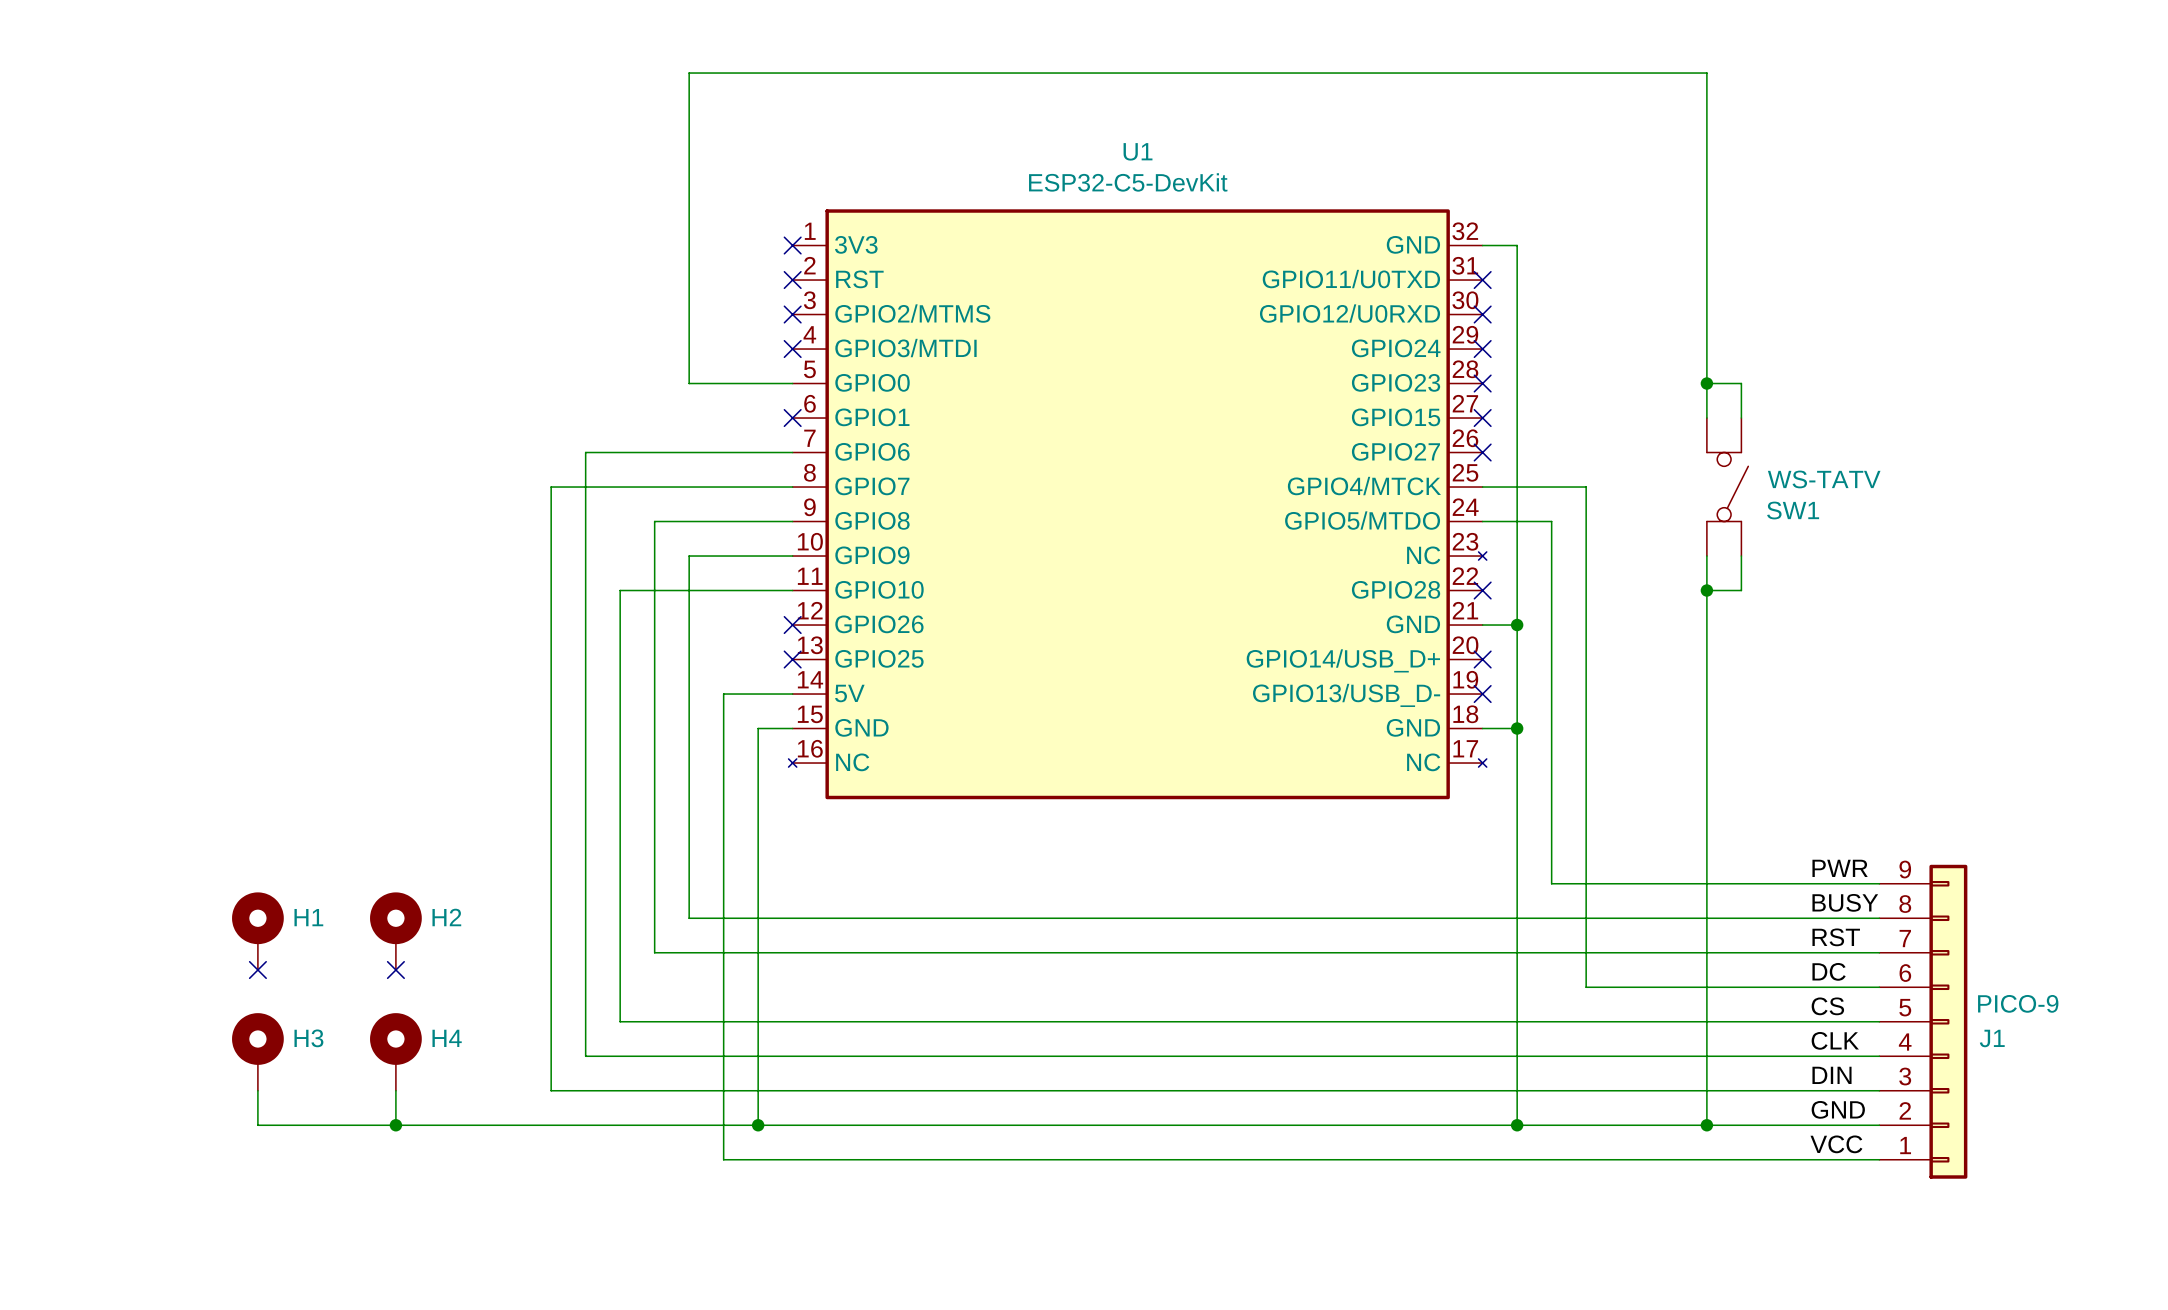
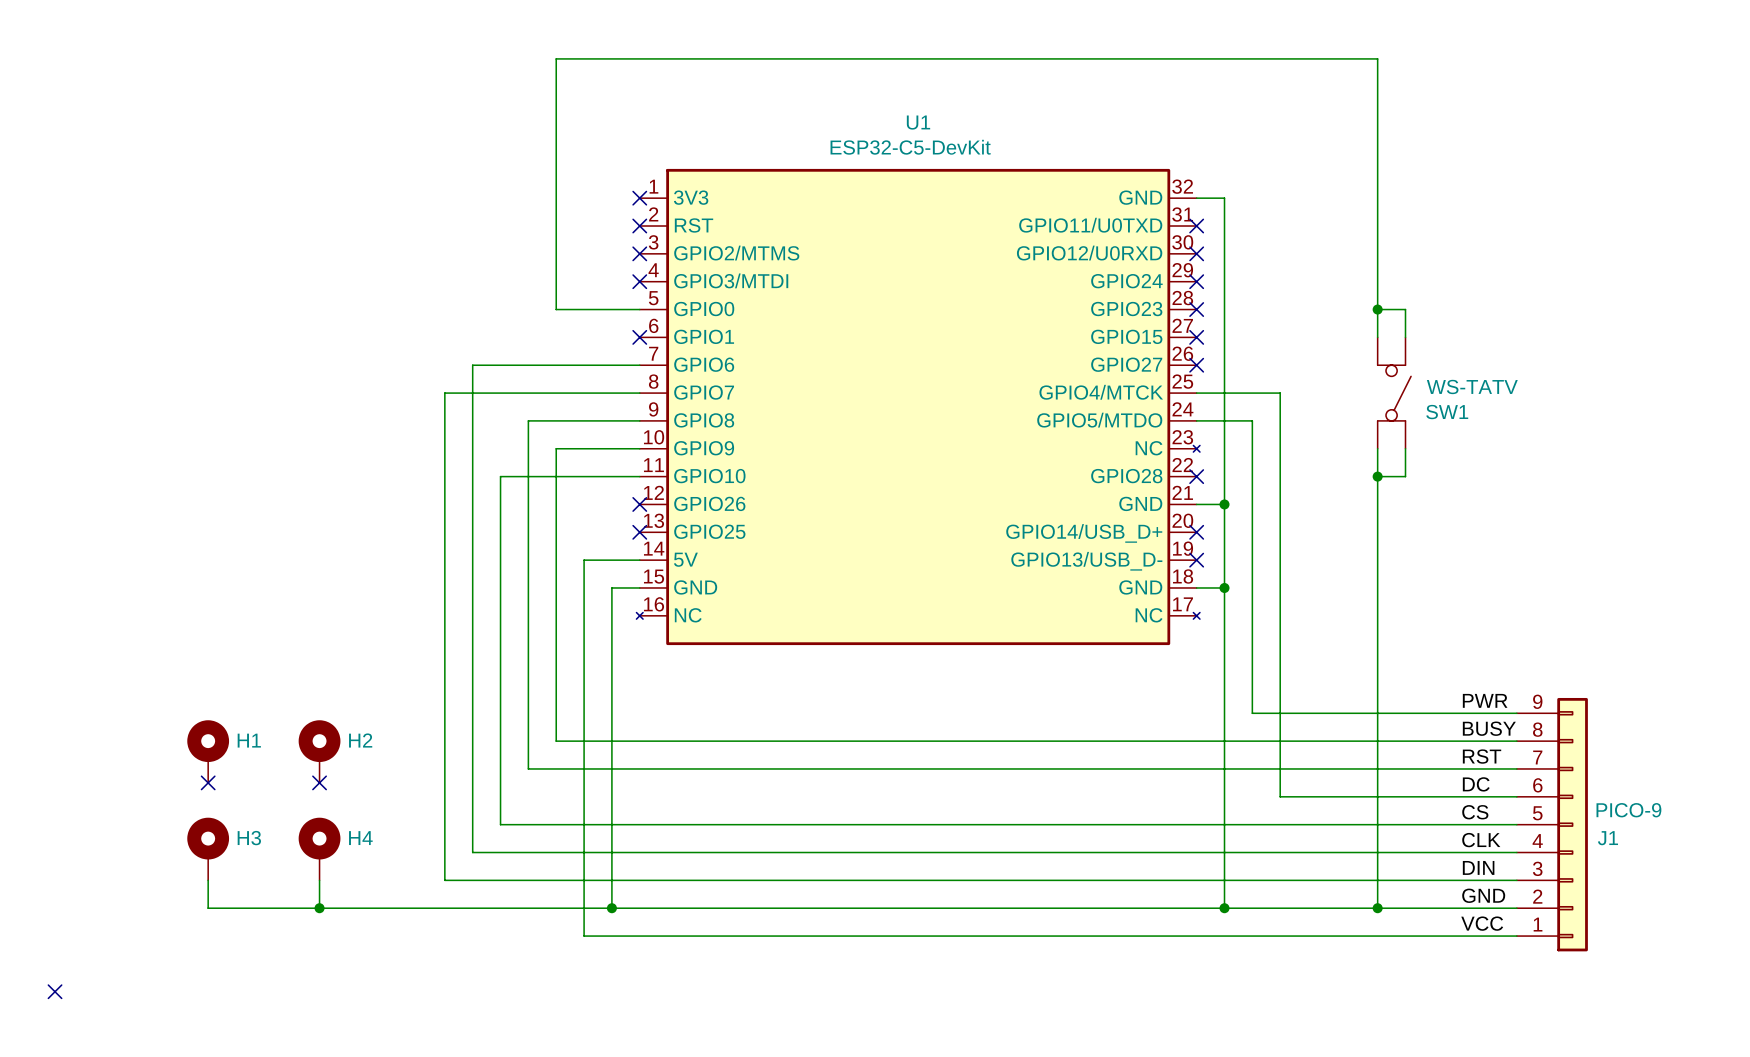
no-connect mark: none -> (55, 991)

